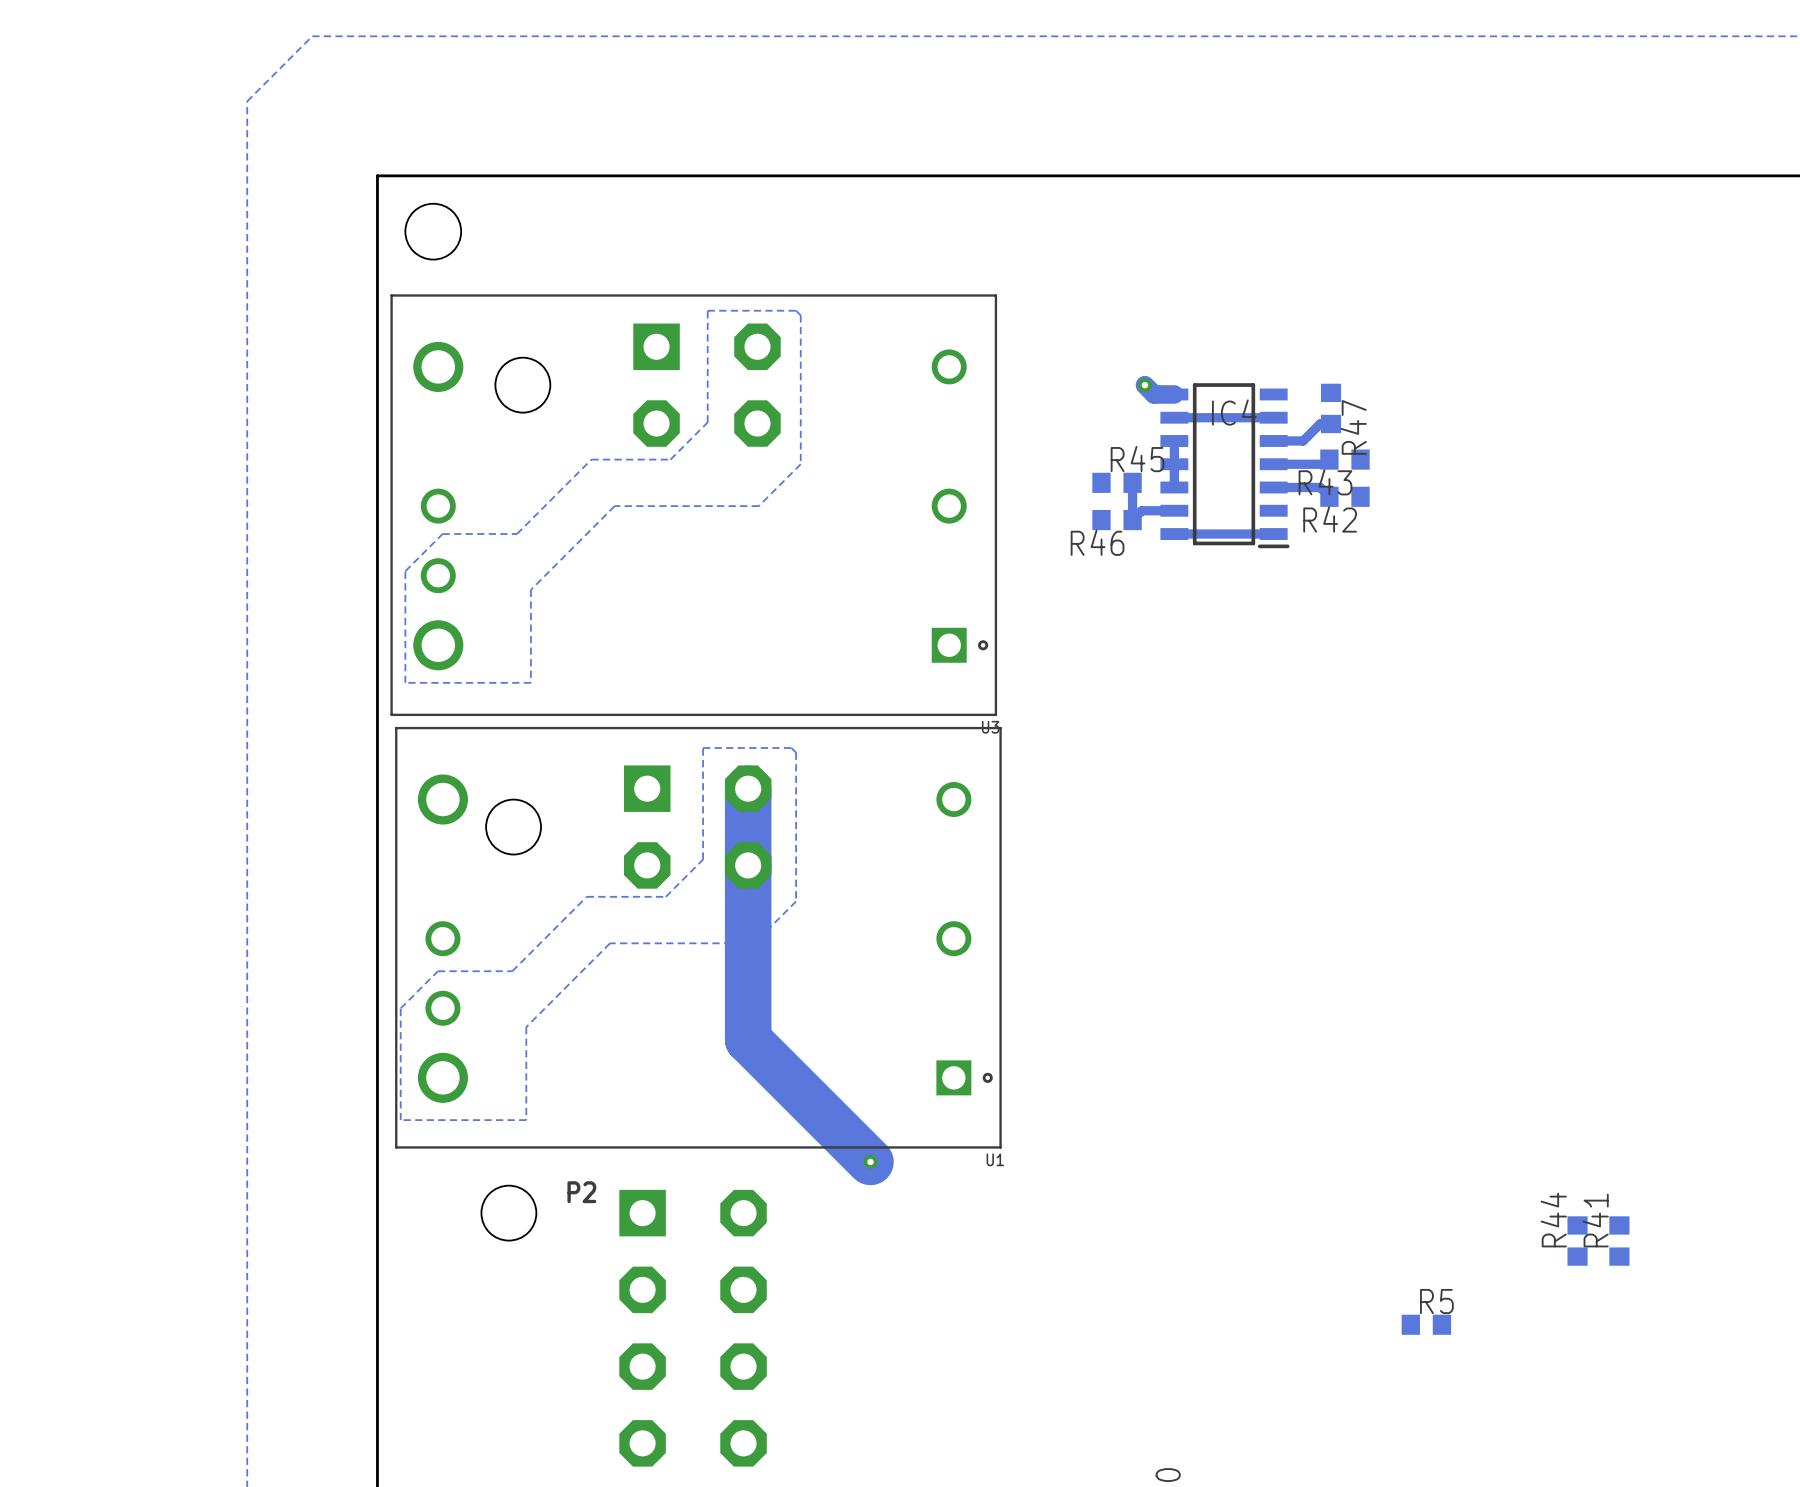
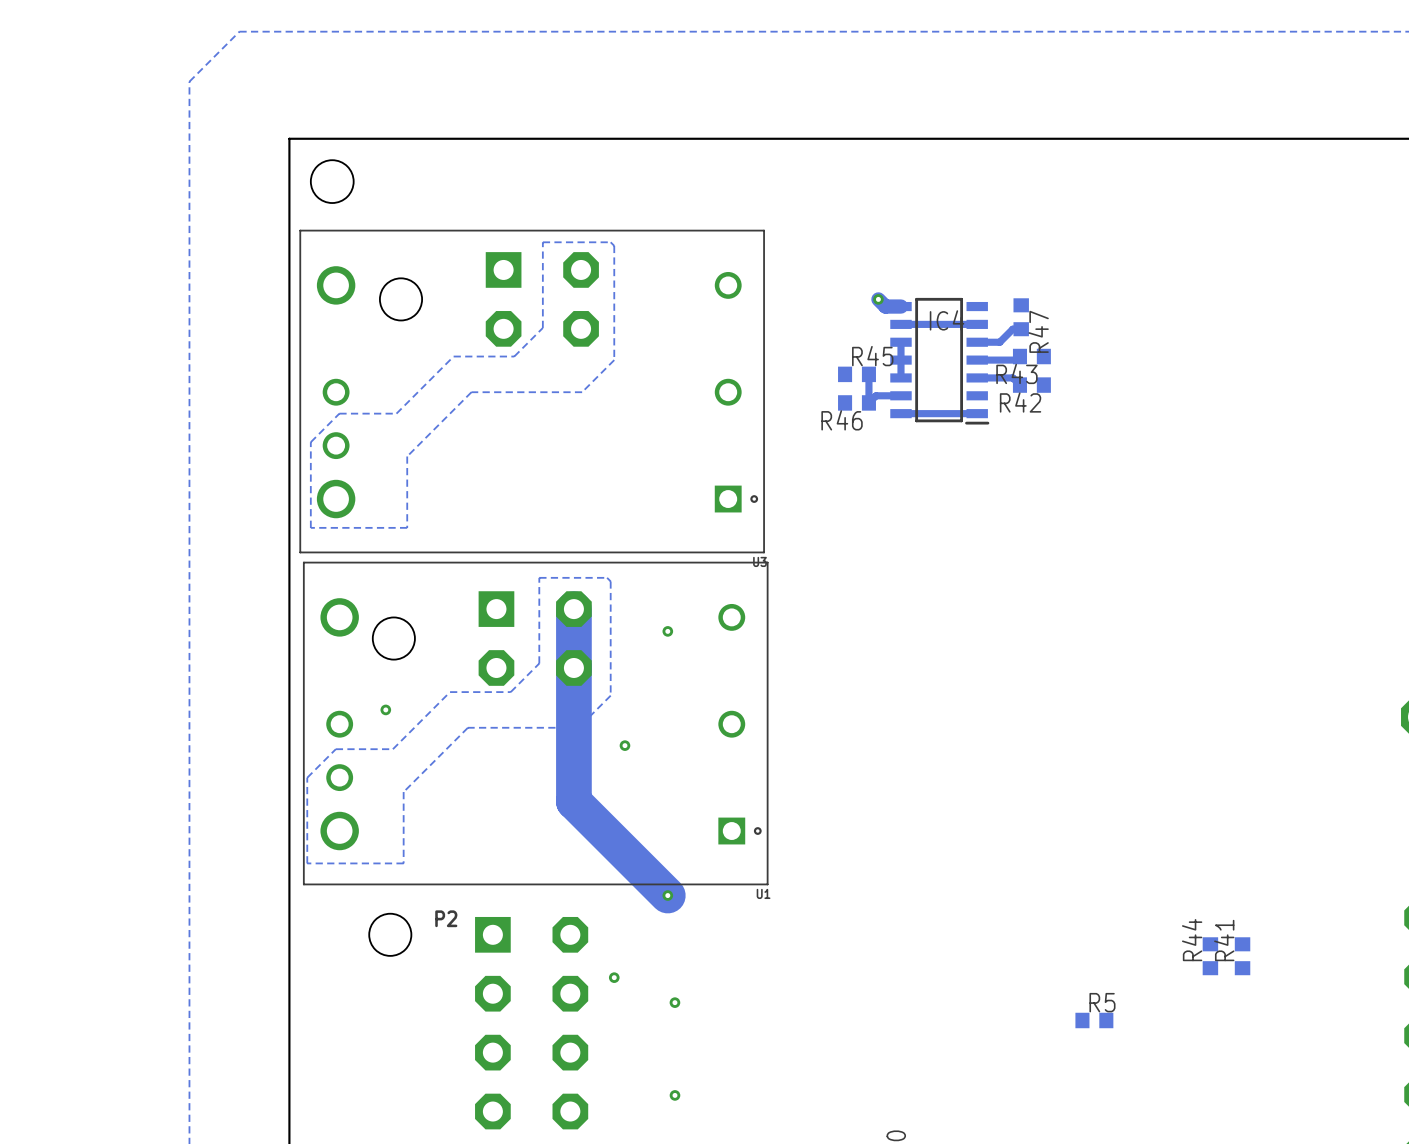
via: none -> (667, 631)
via: none -> (385, 709)
via: none -> (624, 745)
via: none -> (614, 977)
via: none -> (674, 1002)
via: none -> (674, 1095)

